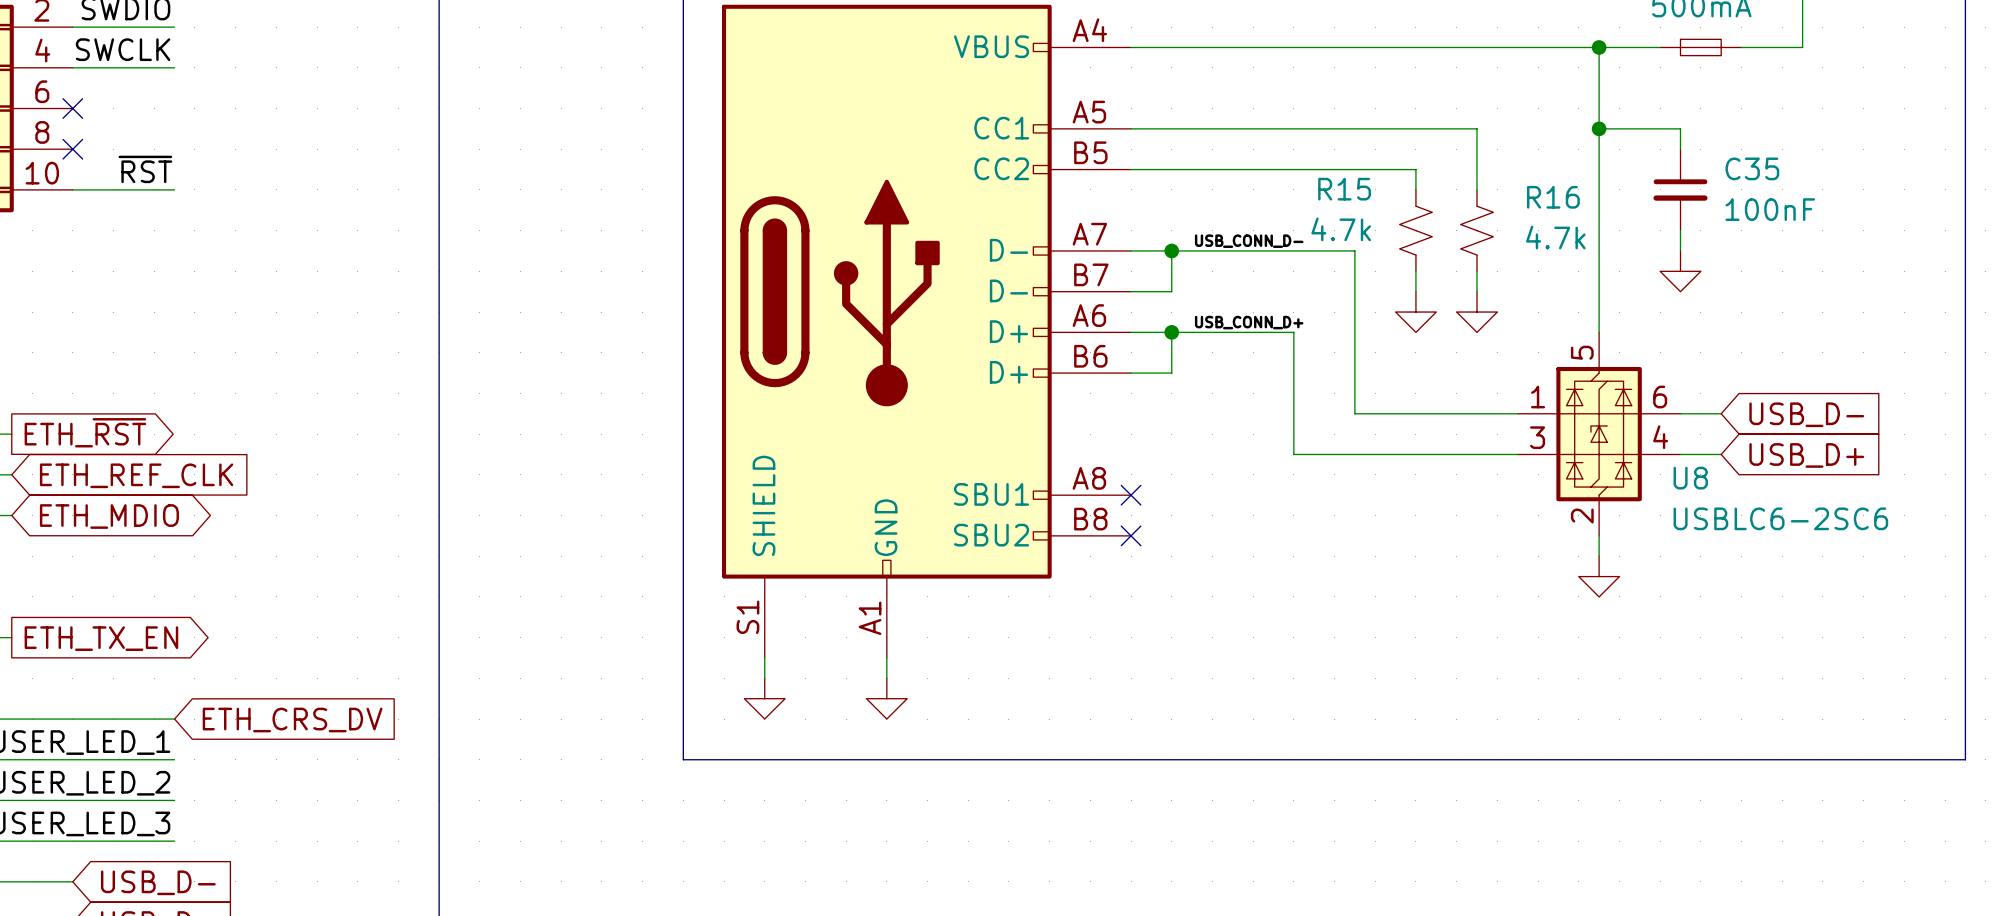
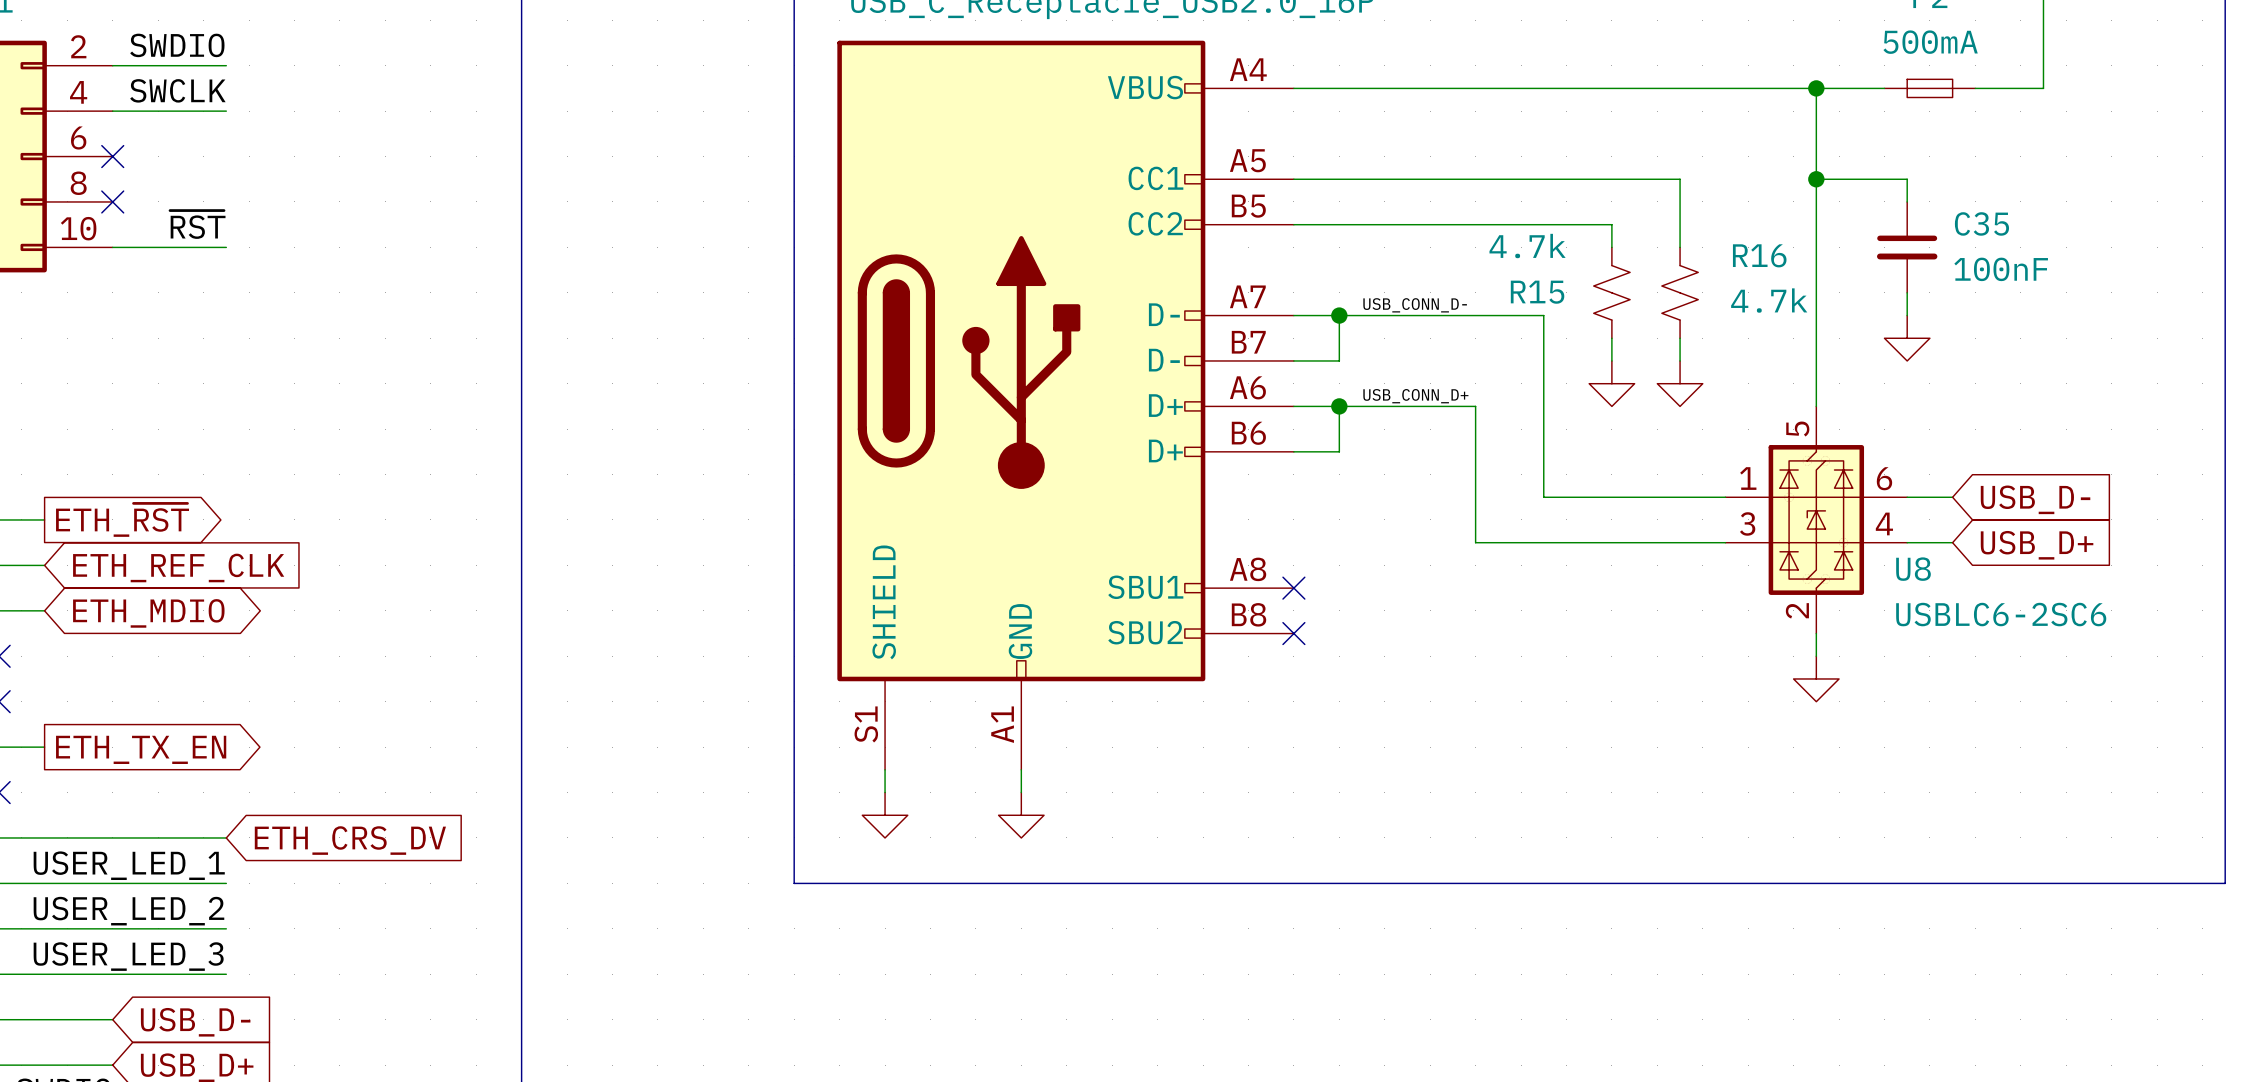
R15 name position: R15 (1344, 189) -> R15 (1537, 292)
R15 value position: 4.7k (1341, 229) -> 4.7k (1527, 246)

